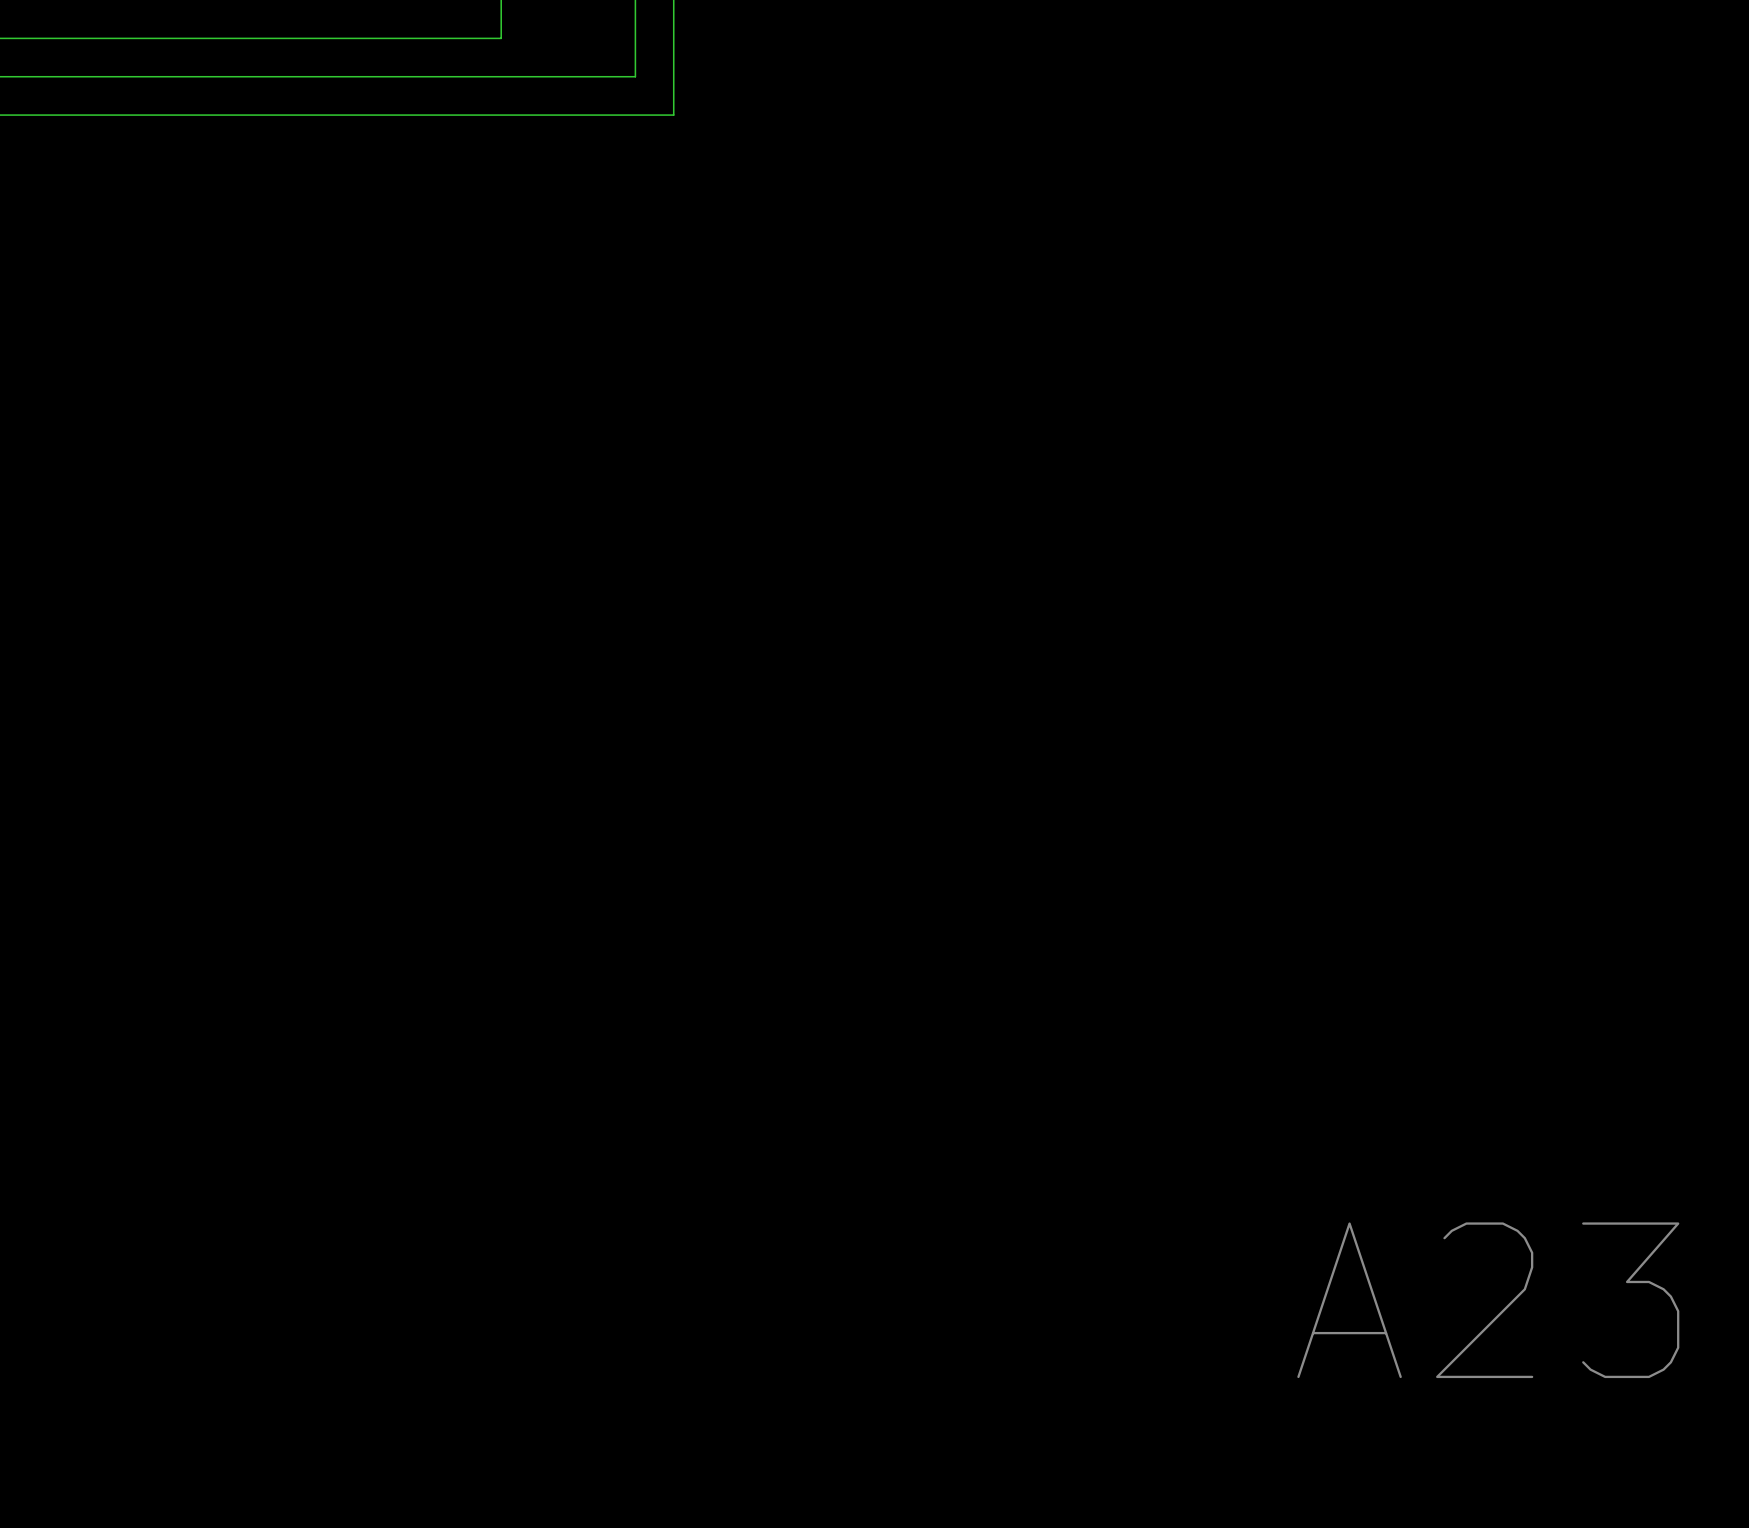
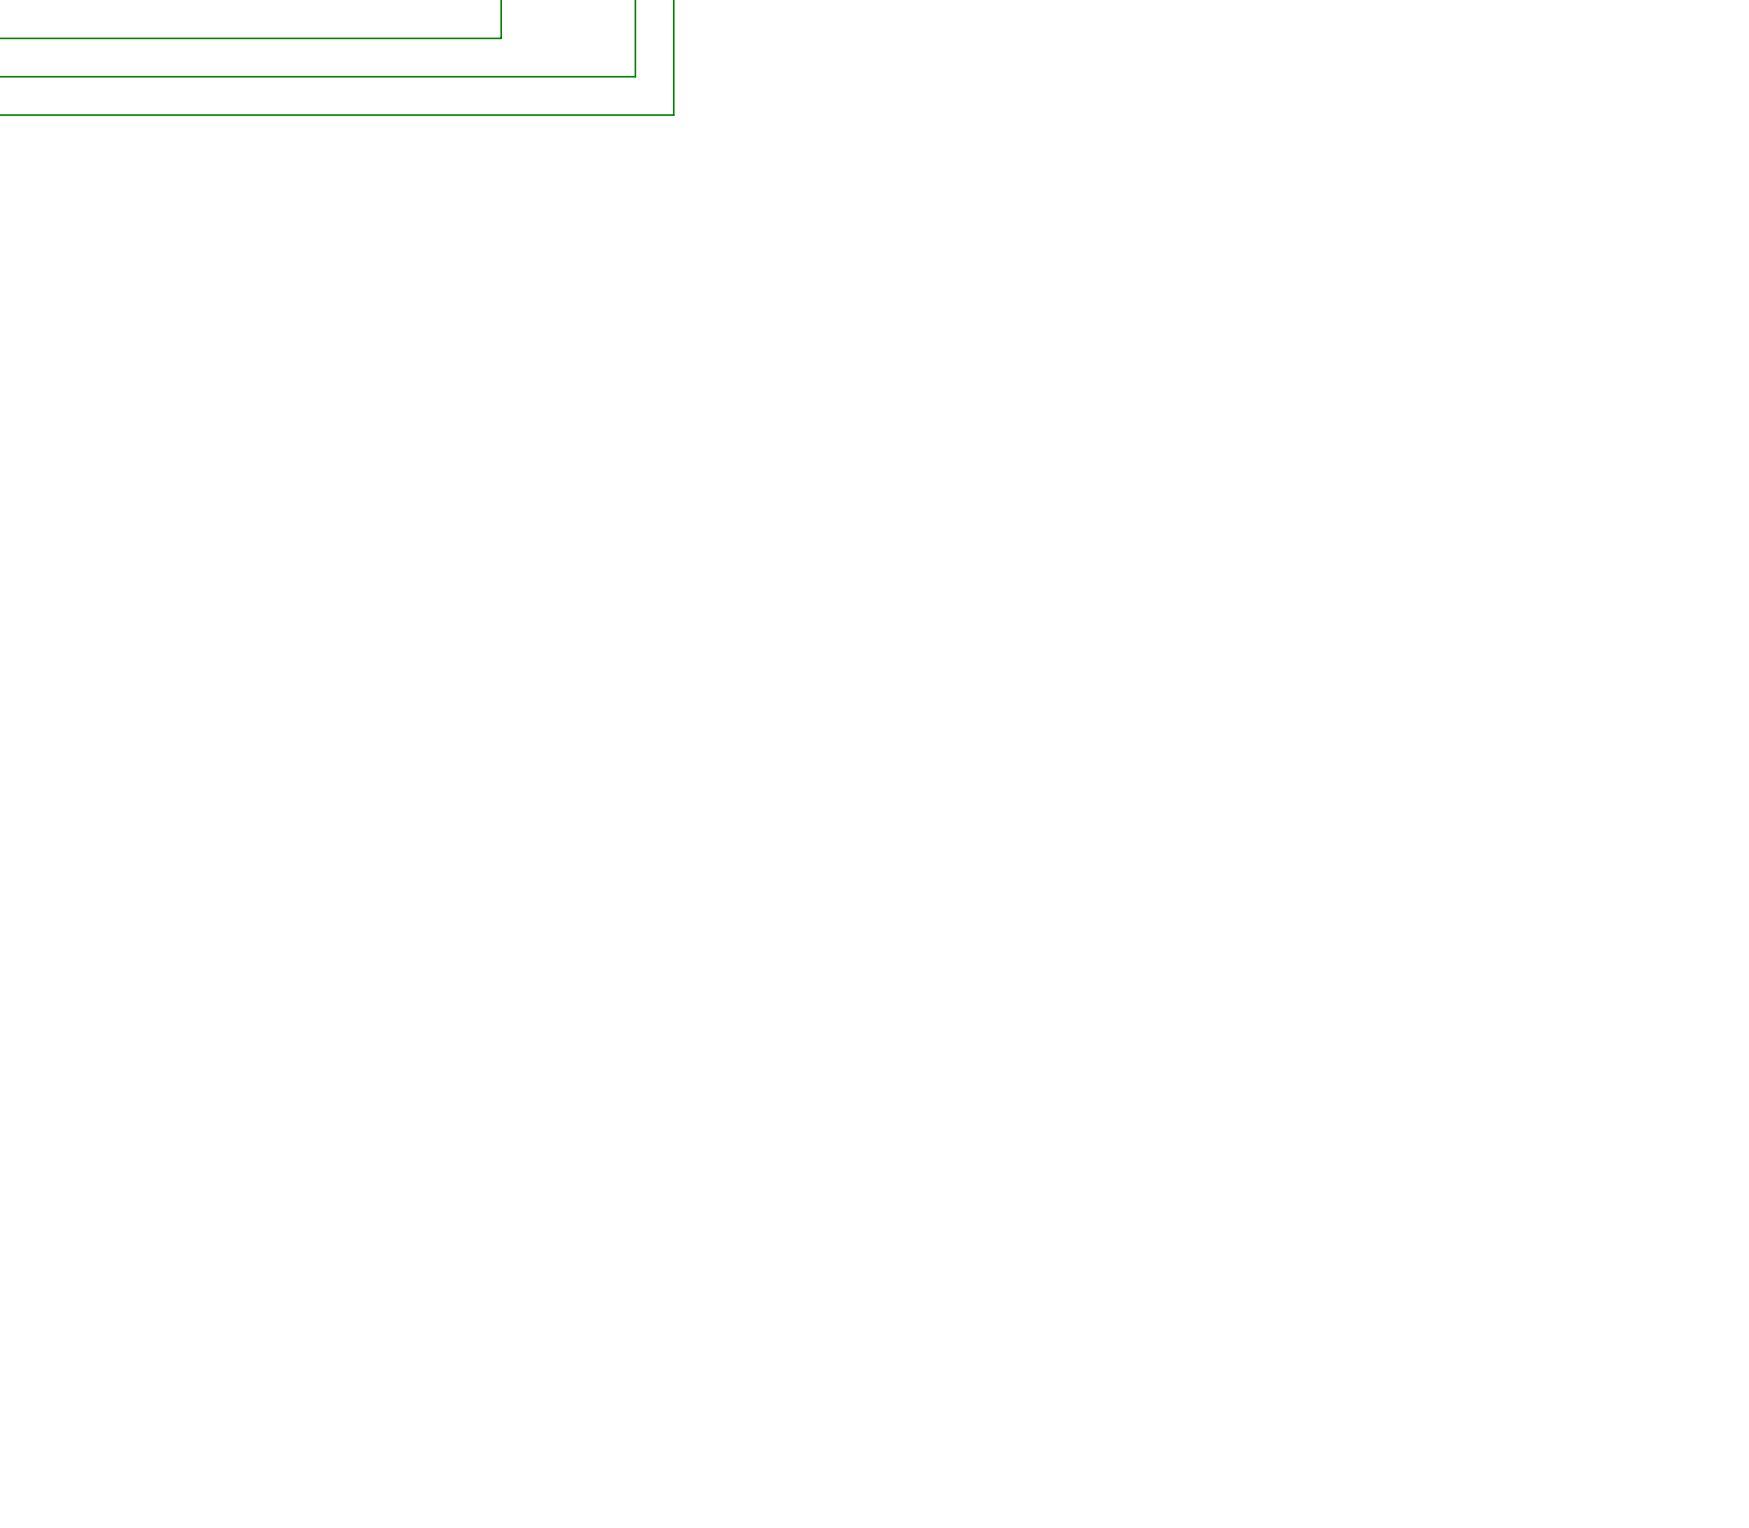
text: A23 (1488, 1300) -> none

